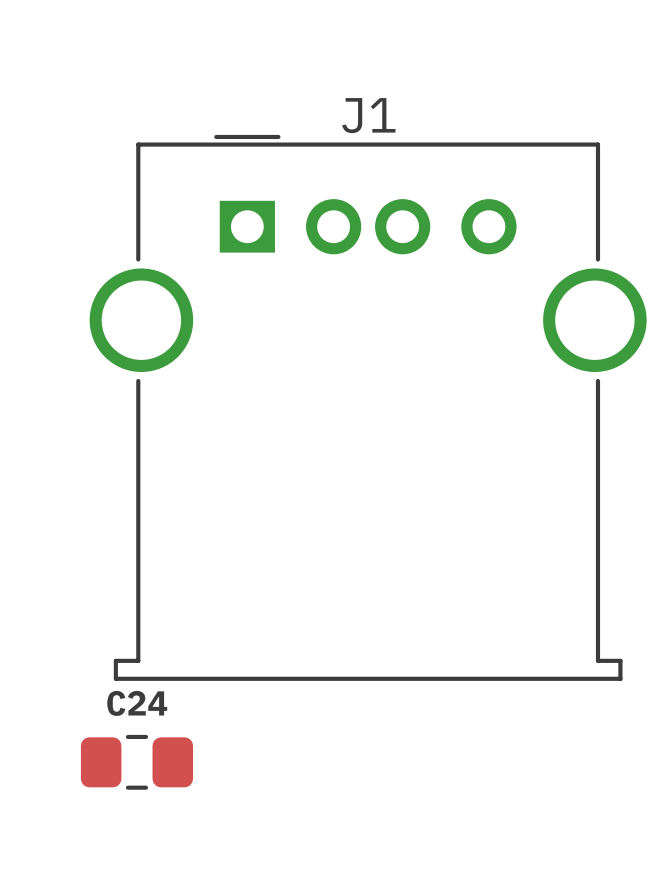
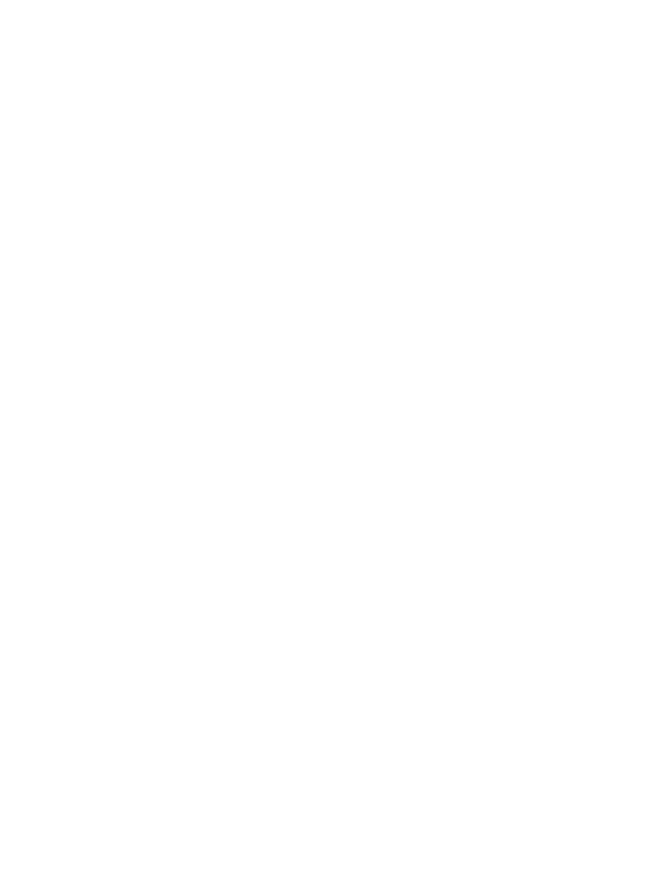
J1: (368, 407) -> none
C24: (136, 762) -> none

